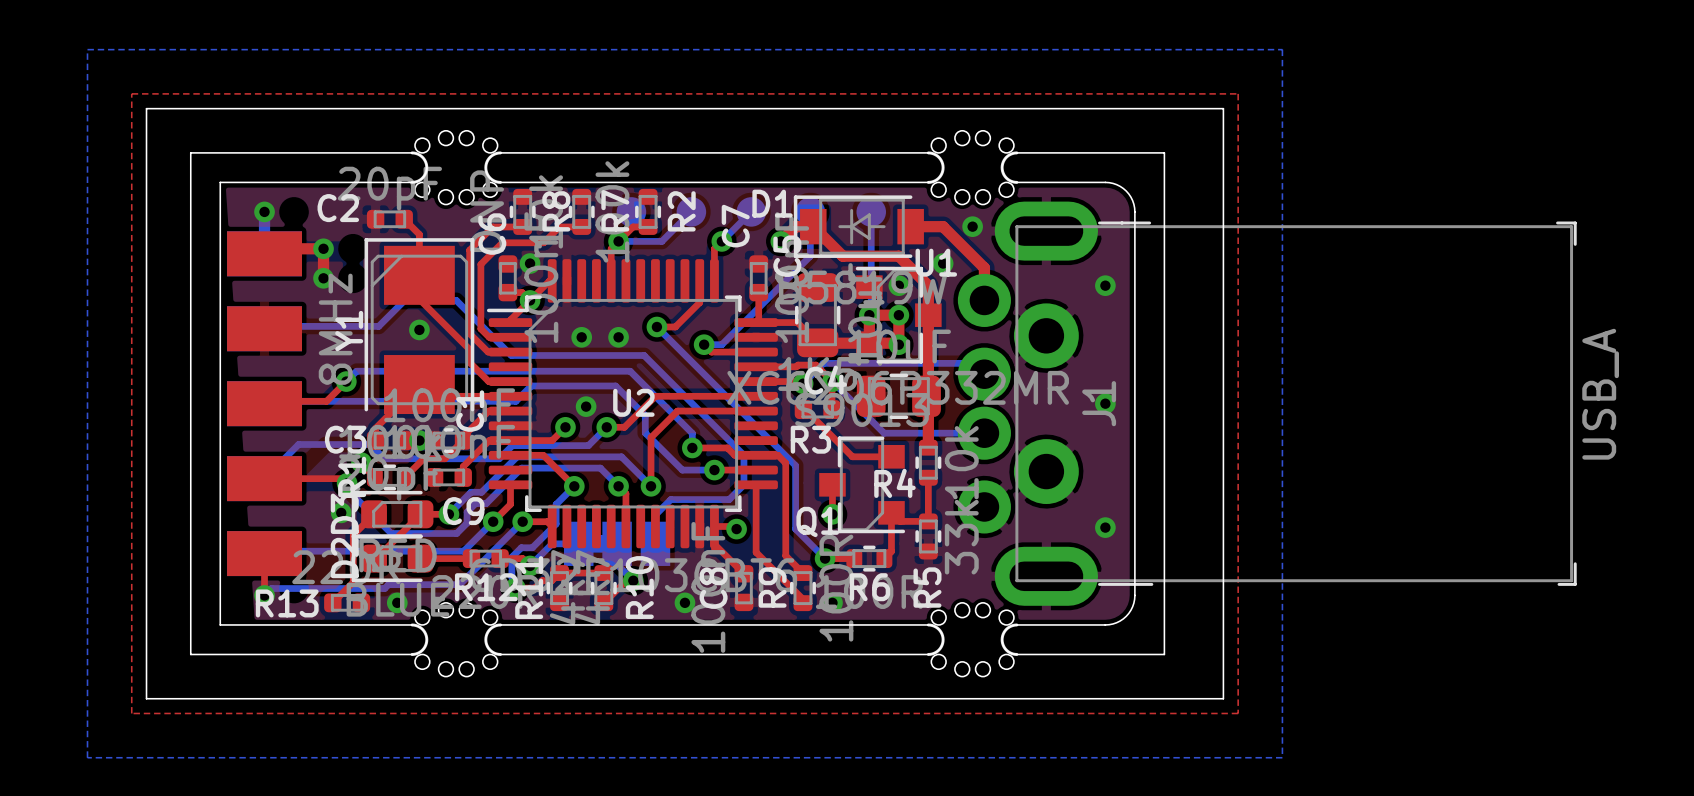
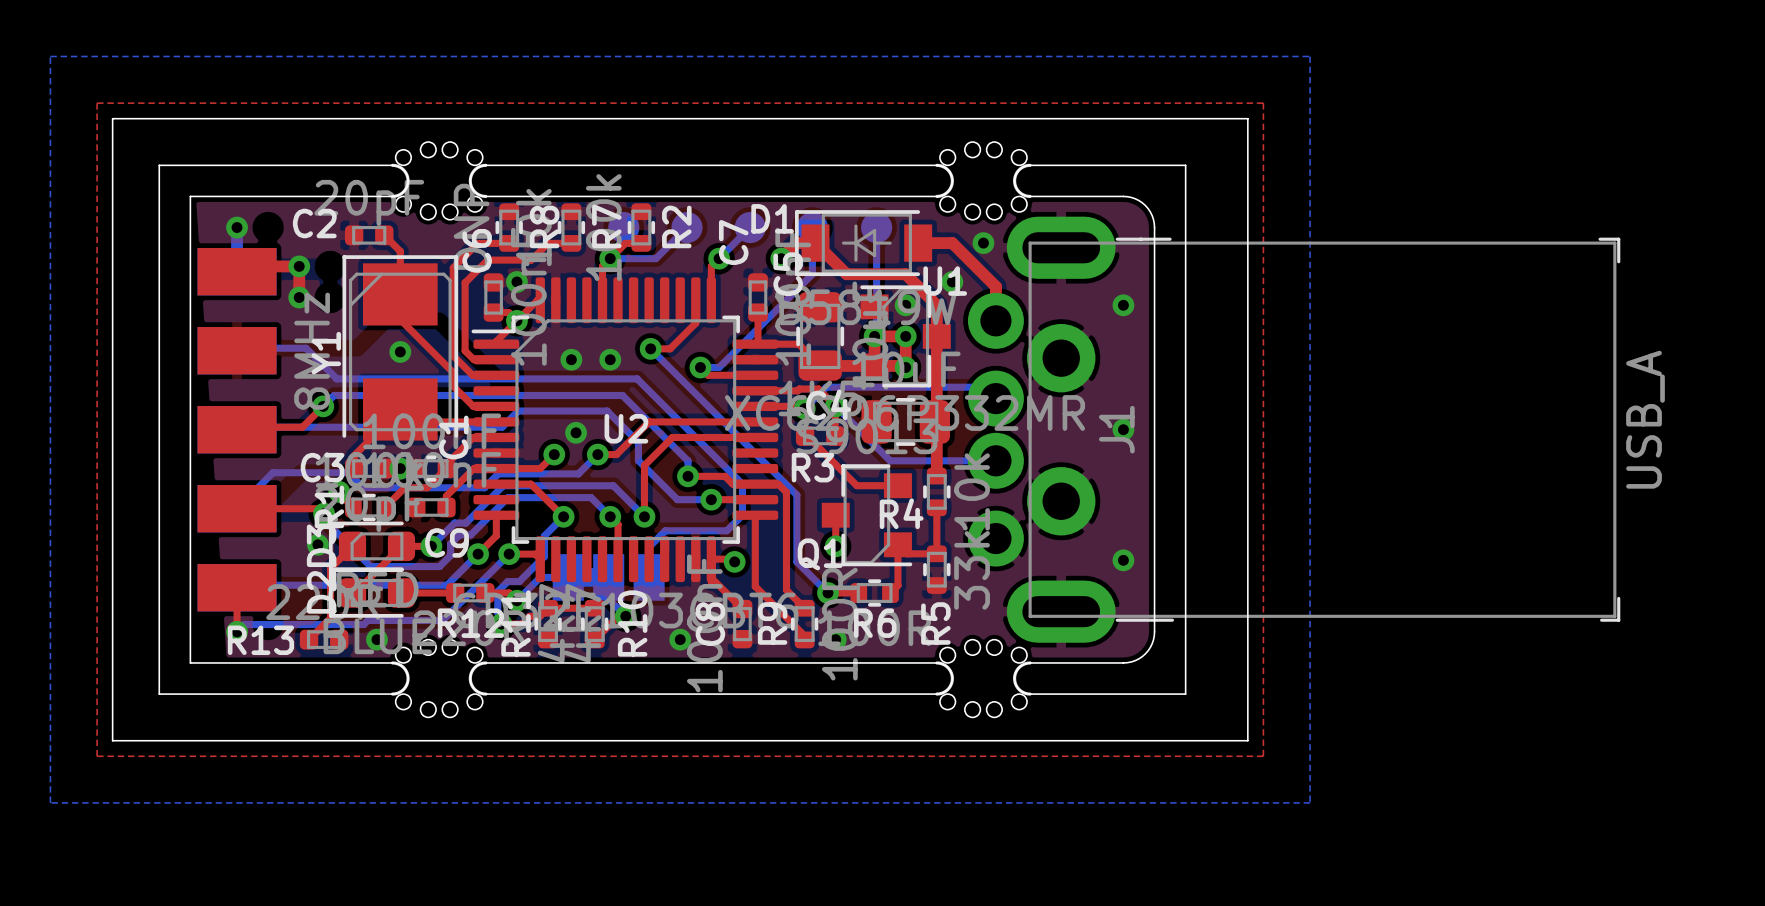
bottom track: (330, 326) (378, 326) (404, 300) (456, 300) (511, 355) -> (306, 348) (336, 378) (497, 378)

